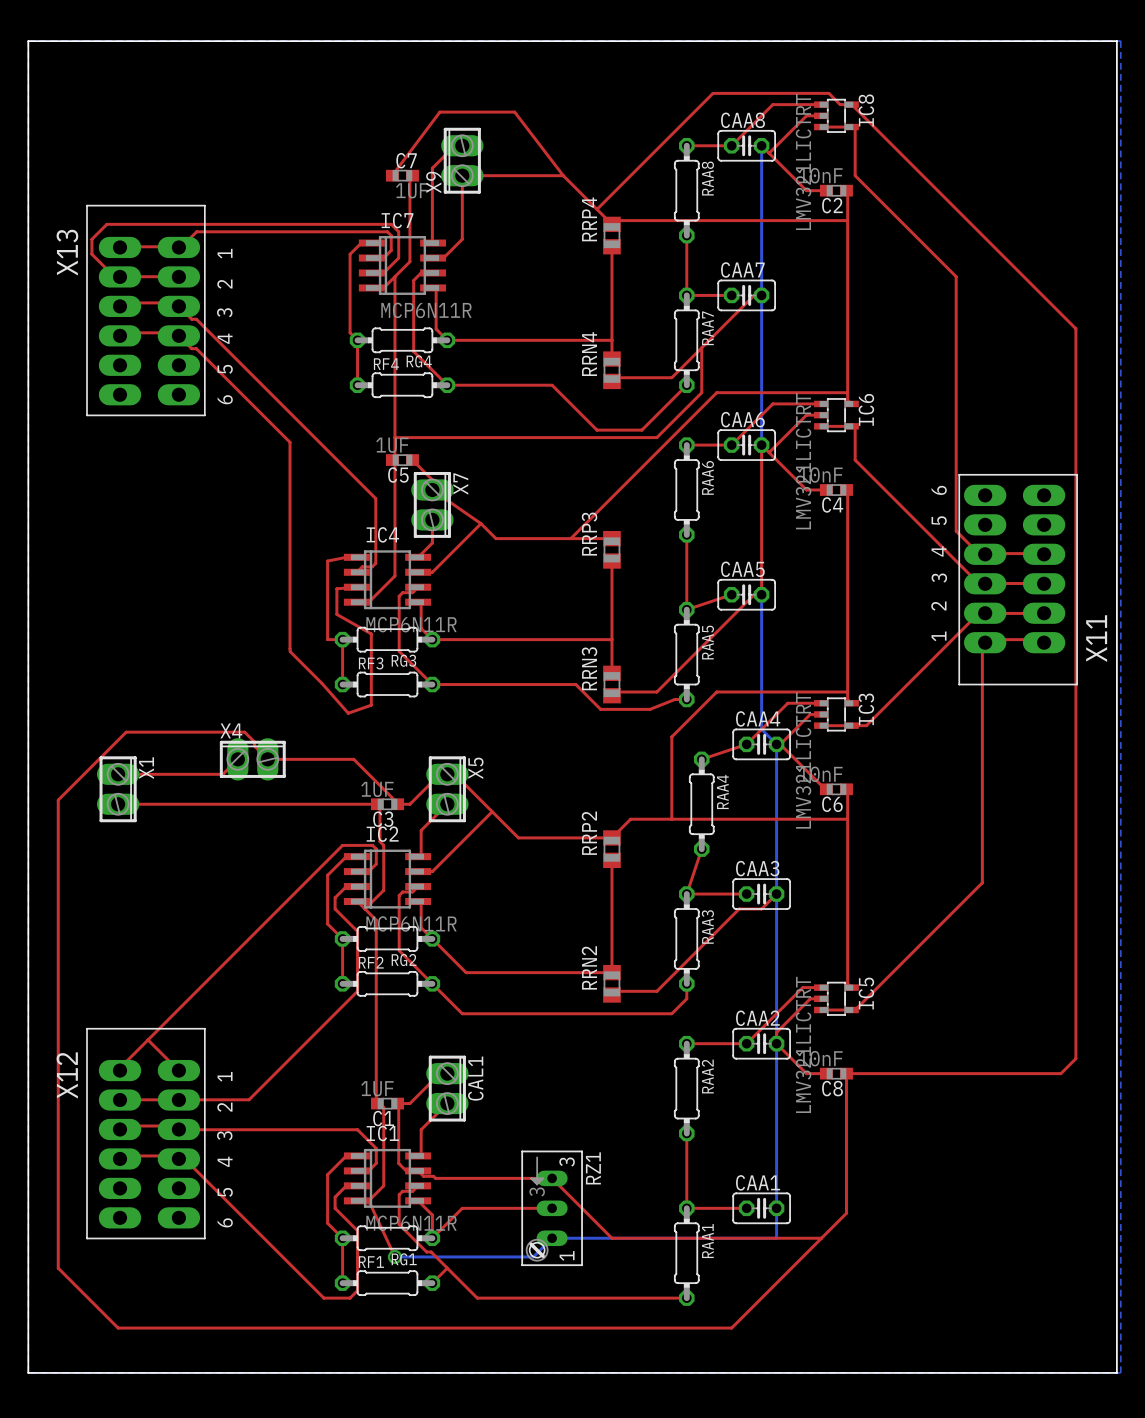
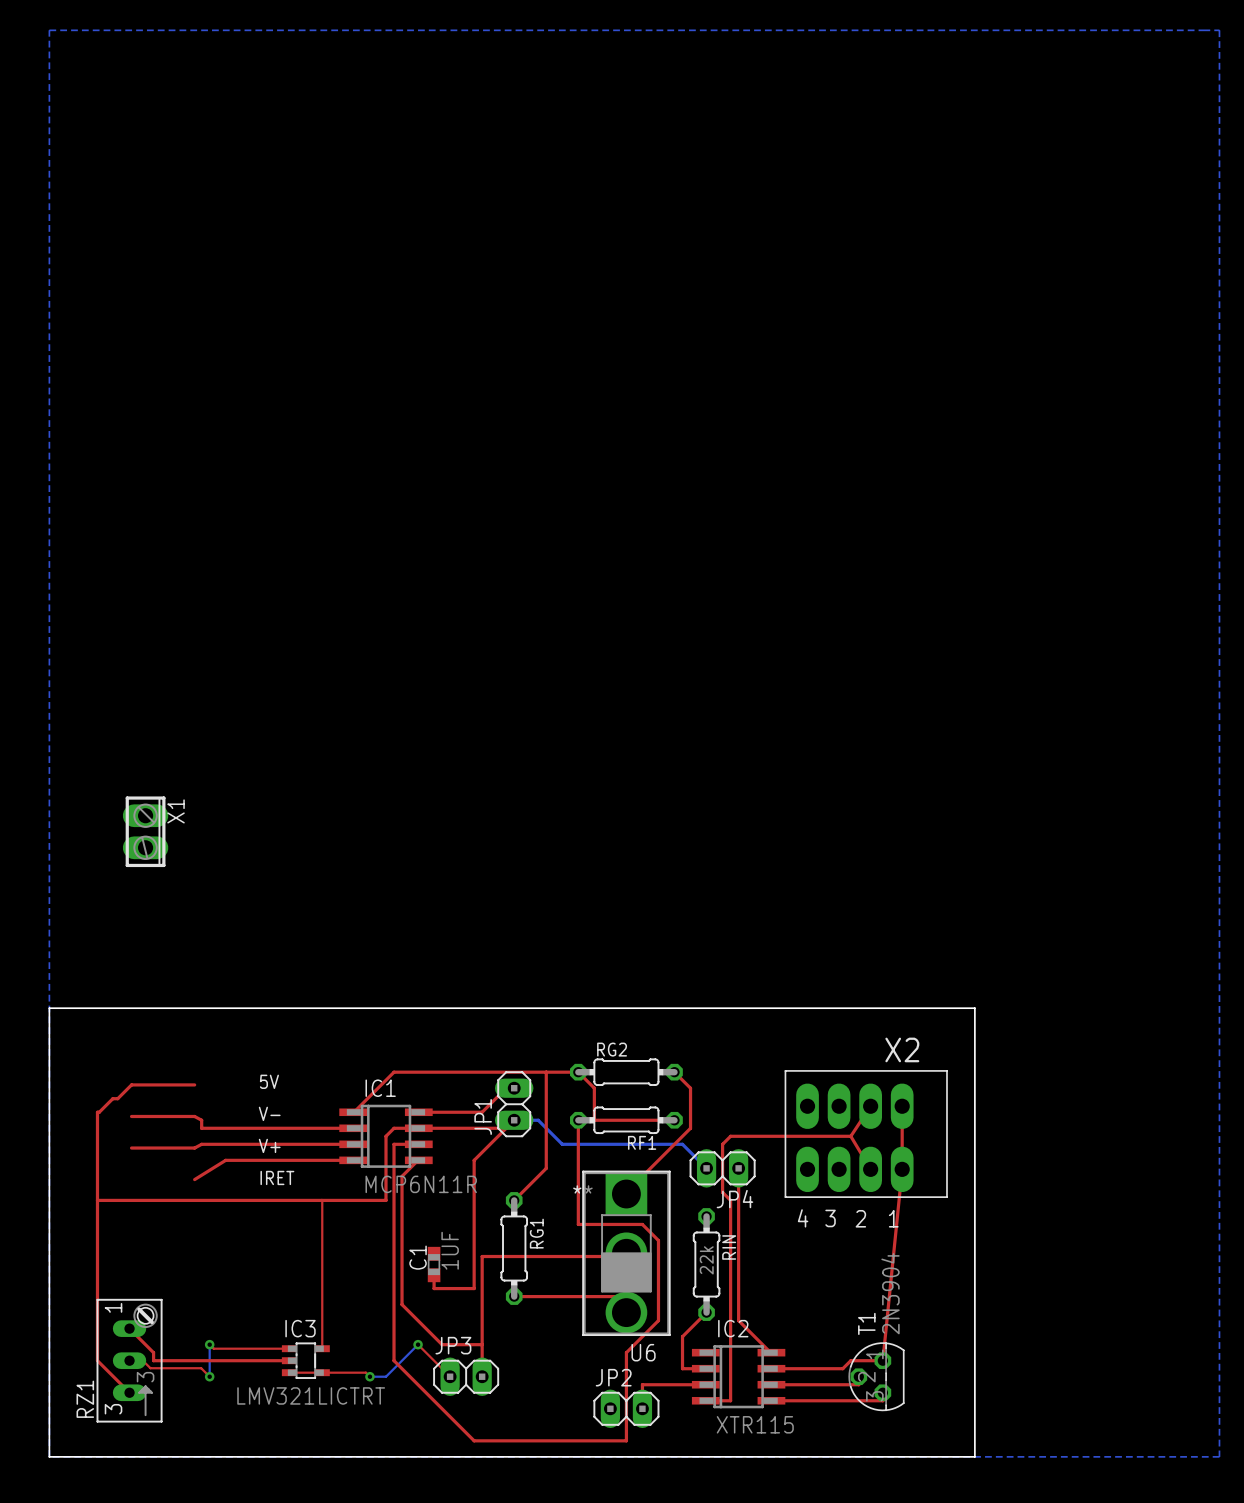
top track: (821, 104) (772, 104) (731, 145) (686, 145) -> none
top track: (821, 115) (806, 115) (769, 153) -> none
IC8: LMV321LICTRT (836, 115) -> none
top track: (821, 127) (855, 127) (855, 175) (956, 276) (956, 531) (982, 557) (986, 553) (1044, 554) -> none
top track: (462, 145) (454, 145) (432, 168) (433, 243) -> none
CAA8: (746, 145) -> none
top track: (761, 145) (806, 190) (826, 190) -> none
bottom track: (761, 145) (761, 445) -> none
X9: (462, 160) -> none
top track: (392, 175) (394, 175) (394, 171) (439, 112) (514, 112) (563, 175) -> none
C7: 1UF (402, 175) -> none
top track: (412, 175) (409, 175) (409, 261) (383, 287) (371, 287) -> none
top track: (563, 175) (611, 224) (608, 220) (847, 220) -> none
top track: (563, 175) (462, 175) (462, 239) (443, 258) (433, 258) -> none
RAA8: (686, 190) -> none
C2: 10nF (836, 190) -> none
top track: (846, 190) (847, 400) (851, 403) -> none
top track: (597, 209) (712, 93) (828, 93) (840, 104) (851, 104) (1075, 328) (1075, 1058) (1060, 1073) (846, 1073) (846, 1213) (776, 1283) -> (902, 1106) (902, 1169) (882, 1360) (850, 1360)
RRP4: (611, 235) -> none
top track: (686, 235) (686, 295) (731, 295) -> none
top track: (371, 243) (361, 243) (350, 254) (350, 332) (357, 340) (357, 385) -> none
top track: (611, 246) (611, 359) -> none
top track: (119, 247) (178, 247) (196, 231) (387, 231) (391, 235) (391, 250) (383, 258) (371, 258) -> none
IC7: MCP6N11R (402, 265) -> none
top track: (371, 272) (383, 272) (398, 258) (398, 231) (391, 224) (106, 224) (91, 239) (91, 254) (118, 280) (121, 276) (178, 276) -> none
top track: (433, 272) (421, 272) (413, 280) (413, 351) (447, 385) (552, 385) (597, 430) (641, 430) (686, 385) -> none
top track: (394, 276) (394, 576) (368, 602) (356, 602) -> none
top track: (433, 287) (436, 287) (436, 329) (447, 340) (611, 340) -> none
CAA7: (746, 295) -> none
top track: (761, 295) (754, 295) (671, 377) (611, 377) (611, 381) -> none
top track: (119, 306) (121, 302) (177, 302) (178, 306) (191, 319) (196, 319) (375, 498) (375, 563) (372, 566) (362, 566) (356, 572) -> none
X13: (145, 310) -> none
top track: (119, 335) (121, 332) (177, 332) (191, 348) (196, 348) (290, 442) (290, 651) (348, 713) (371, 705) (371, 633) (336, 614) (336, 588) (356, 587) -> none
RG4: (402, 340) -> none
RAA7: (686, 340) -> none
top track: (701, 347) (701, 392) (656, 437) (394, 437) -> none
RRN4: (611, 370) -> none
RF4: (402, 385) -> none
top track: (847, 392) (716, 392) (570, 538) -> none
top track: (821, 403) (772, 403) (731, 445) (686, 445) -> none
top track: (821, 415) (806, 415) (769, 452) -> none
IC6: LMV321LICTRT (836, 415) -> none
top track: (821, 426) (855, 426) (855, 460) (982, 587) (986, 583) (1044, 583) -> none
CAA6: (746, 445) -> none
C5: 1UF (402, 460) -> none
top track: (412, 460) (432, 479) (432, 489) (481, 523) -> none
RAA6: (686, 489) -> none
top track: (826, 489) (806, 489) (761, 445) (761, 594) (754, 594) (656, 692) (611, 692) (611, 695) -> none
C4: 10nF (836, 489) -> none
top track: (846, 489) (847, 699) (851, 703) -> none
X7: (432, 504) -> none
top track: (432, 519) (432, 543) (418, 557) -> none
top track: (481, 523) (495, 538) (611, 538) -> none
top track: (481, 523) (432, 572) (418, 572) -> none
top track: (686, 534) (686, 609) (731, 594) -> none
RRP3: (611, 549) -> none
top track: (356, 557) (327, 561) (327, 639) (342, 639) (342, 684) -> none
top track: (611, 561) (611, 673) -> none
IC4: MCP6N11R (387, 579) -> none
X11: (1018, 579) -> none
top track: (428, 587) (418, 587) (412, 592) (402, 592) (399, 596) (399, 651) (432, 684) (575, 684) (600, 709) (650, 709) (674, 699) (686, 699) -> none
CAA5: (746, 594) -> none
bottom track: (761, 594) (761, 729) (776, 744) (776, 1238) (552, 1238) (533, 1256) (394, 1256) -> none
top track: (418, 602) (421, 602) (421, 628) (432, 639) (611, 639) -> none
top track: (1044, 613) (986, 613) (982, 609) (866, 725) (821, 725) -> none
RG3: (387, 639) -> none
top track: (1044, 642) (1042, 639) (986, 639) (982, 643) (982, 882) (855, 1010) (821, 1009) -> none
RAA5: (686, 654) -> none
RF3: (387, 684) -> none
RRN3: (611, 684) -> none
top track: (847, 692) (716, 692) (671, 736) (671, 819) -> none
top track: (821, 703) (787, 703) (746, 744) (701, 759) -> none
IC3 name rotation: 0° (866, 709) -> 90° clockwise (300, 1328)
top track: (821, 714) (810, 714) (780, 744) -> none
IC3 position: (836, 714) -> (305, 1360)
CAA4: (761, 744) -> none
top track: (780, 744) (826, 789) -> none
top track: (237, 759) (222, 774) (118, 774) -> none
X4: (252, 759) -> none
IC3 value rotation: 0° (803, 760) -> 90° clockwise (311, 1395)
X5: (447, 789) -> none
C6: 10nF (836, 789) -> none
top track: (846, 789) (847, 983) (851, 987) -> none
top track: (118, 804) (380, 804) (380, 841) (383, 845) (383, 890) (365, 909) -> none
C3: 1UF (387, 804) -> none
top track: (397, 804) (409, 804) (439, 774) (454, 774) (518, 837) (611, 837) (630, 819) (847, 819) -> none
top track: (398, 804) (353, 759) (267, 759) (254, 746) (254, 741) (244, 732) (126, 732) (58, 800) (58, 1268) (73, 1283) -> (194, 1084) (131, 1084) (117, 1098) (112, 1098) (97, 1112) (97, 1360)
top track: (447, 804) (421, 830) (421, 856) (418, 856) -> none
RAA4: (701, 804) -> none
top track: (492, 811) (432, 871) (418, 871) -> none
RRP2: (611, 849) -> none
top track: (701, 849) (686, 894) (746, 894) -> none
top track: (356, 856) (346, 856) (327, 875) (327, 923) (342, 938) (342, 983) -> none
top track: (611, 860) (611, 972) (466, 972) (421, 927) (421, 901) (418, 901) -> none
top track: (356, 871) (368, 871) (376, 864) (376, 849) (372, 845) (342, 845) (118, 1069) (119, 1070) -> none
IC2 position: (387, 879) -> (738, 1376)
top track: (356, 886) (346, 886) (335, 897) (335, 909) (357, 931) (357, 991) (249, 1099) (119, 1100) -> none
top track: (428, 886) (418, 886) (412, 892) (402, 892) (399, 895) (399, 950) (462, 1013) -> (353, 1112) (394, 1072) (514, 1072)
CAA3: (761, 894) -> none
top track: (776, 894) (761, 909) (739, 909) (656, 991) (611, 991) (611, 995) -> none
top track: (356, 901) (376, 920) (376, 1103) (380, 1103) (383, 1107) (383, 1185) (368, 1200) -> none
IC2 value: MCP6N11R (411, 923) -> XTR115 (755, 1424)
RG2 position: (387, 938) -> (626, 1072)
RAA3: (686, 938) -> none
board edge: (28, 954) (28, 41) (1116, 41) (1116, 1372) (892, 1372) -> (49, 1008) (974, 1008) (974, 1456)
RG2 name position: RG2 (404, 960) -> RG2 (612, 1049)
RF2: (387, 983) -> none
RRN2: (611, 983) -> none
top track: (686, 983) (686, 998) (671, 1013) (522, 1013) -> (674, 1120) (594, 1120) (594, 1088) (578, 1072)
top track: (821, 987) (802, 987) (746, 1043) (686, 1043) -> none
top track: (821, 998) (810, 998) (776, 1032) (776, 1043) (806, 1073) (826, 1073) -> none
IC5: LMV321LICTRT (836, 998) -> none
top track: none -> (546, 1072) (546, 1168) (514, 1200)
top track: none -> (674, 1072) (690, 1088) (690, 1128) (626, 1194)
text: none -> 5V (269, 1081)
top track: none -> (514, 1088) (506, 1088) (482, 1112) (418, 1112)
top track: (148, 1039) (178, 1070) -> none
JP1: none -> (514, 1104)
CAA2: (761, 1043) -> none
top track: none -> (870, 1106) (850, 1136)
text: none -> V- (269, 1113)
top track: none -> (131, 1116) (194, 1116) (201, 1120) (201, 1128) (353, 1128)
top track: none -> (514, 1120) (474, 1160) (474, 1288) (434, 1288) (434, 1275)
bottom track: none -> (514, 1120) (538, 1120) (562, 1144) (682, 1144) (706, 1168)
top track: none -> (578, 1120) (578, 1224) (642, 1224) (658, 1240) (658, 1320) (626, 1352) (626, 1440) (474, 1440) (394, 1360) (394, 1144) (418, 1144)
top track: none -> (506, 1128) (394, 1128) (385, 1136) (385, 1200) (97, 1200)
X2: none -> (866, 1134)
top track: (447, 1073) (439, 1073) (409, 1103) (397, 1103) -> none
top track: none -> (850, 1136) (730, 1136) (722, 1144) (722, 1192) (730, 1200) (730, 1400) (705, 1400)
top track: none -> (850, 1136) (870, 1169)
C8: 10nF (836, 1073) -> none
top track: none -> (353, 1144) (201, 1144) (194, 1148) (131, 1148)
text: none -> V+ (269, 1145)
CAL1: (447, 1088) -> none
RAA2: (686, 1088) -> none
top track: none -> (353, 1160) (225, 1160) (194, 1179)
top track: none -> (418, 1160) (402, 1176) (402, 1304) (442, 1344) (482, 1344)
C1 rotation: 0° (387, 1103) -> 90° clockwise (434, 1264)
C1 position: (387, 1103) -> (434, 1264)
top track: (398, 1103) (398, 1163) (406, 1170) (418, 1170) (423, 1176) (433, 1176) (435, 1178) (552, 1178) (611, 1238) (821, 1238) -> none
top track: (447, 1103) (421, 1129) (421, 1155) (418, 1155) -> none
JP4: none -> (722, 1168)
top track: none -> (738, 1168) (738, 1320) (771, 1352)
text: none -> IRET (277, 1177)
top track: (119, 1129) (121, 1126) (177, 1126) (178, 1129) (181, 1129) (357, 1129) (376, 1148) (376, 1163) (368, 1170) (356, 1170) -> none
X12: (145, 1133) -> none
top track: none -> (321, 1200) (322, 1348)
top track: (686, 1133) (686, 1208) (746, 1208) -> none
RZ1 footprint: [521, 1150, 583, 1267] -> [96, 1298, 163, 1423]
top track: (356, 1155) (346, 1155) (327, 1174) (327, 1223) (342, 1238) (342, 1283) -> none
top track: (119, 1158) (121, 1155) (177, 1155) (178, 1158) (181, 1155) (323, 1298) (350, 1298) (357, 1290) (357, 1230) (335, 1208) (335, 1197) (346, 1185) (356, 1185) -> none
RZ1 name position: RZ1 (593, 1168) -> RZ1 (85, 1399)
IC1 position: (387, 1178) -> (385, 1136)
U6: none -> (626, 1253)
top track: (428, 1185) (418, 1185) (412, 1191) (402, 1191) (399, 1194) (399, 1224) (426, 1252) (431, 1252) (477, 1298) (686, 1298) -> none
RIN: none -> 22k (706, 1264)
top track: (368, 1200) (394, 1256) -> none
top track: (418, 1200) (432, 1215) -> (626, 1253) (626, 1256) (482, 1256) (482, 1287)
top track: (552, 1208) (462, 1208) (432, 1238) -> (482, 1376) (482, 1312)
CAA1: (761, 1208) -> none
top track: none -> (514, 1296) (626, 1296) (626, 1312)
RG1 rotation: 0° (387, 1238) -> 90° clockwise (514, 1248)
RG1 position: (387, 1238) -> (514, 1248)
top track: none -> (706, 1312) (682, 1336) (682, 1368) (705, 1368)
top track: none -> (129, 1328) (153, 1352) (153, 1360) (289, 1360)
RAA1: (686, 1253) -> none
via: (394, 1256) -> none
RG1 name position: RG1 (404, 1259) -> RG1 (536, 1233)
RF1 name position: RF1 (371, 1262) -> RF1 (642, 1142)
top track: none -> (209, 1344) (213, 1348) (289, 1348)
bottom track: none -> (209, 1344) (209, 1376)
via: none -> (209, 1344)
top track: none -> (418, 1344) (450, 1376)
bottom track: none -> (418, 1344) (385, 1376) (369, 1376)
via: none -> (418, 1344)
top track: (447, 1268) (432, 1283) -> none
top track: none -> (129, 1360) (142, 1360) (150, 1368) (201, 1368) (209, 1376)
RF1 position: (387, 1283) -> (626, 1120)
top track: (769, 1290) (731, 1328) (118, 1328) (103, 1313) -> (842, 1368) (771, 1368)
top track: none -> (289, 1372) (365, 1372) (369, 1376)
via: none -> (209, 1376)
via: none -> (369, 1376)
JP3: none -> (466, 1376)
top track: none -> (858, 1376) (858, 1384) (771, 1384)
T1: none -> 2N3904 (876, 1376)
top track: none -> (705, 1384) (642, 1384) (642, 1408)
top track: none -> (882, 1392) (882, 1400) (771, 1400)
JP2: none -> (626, 1408)

